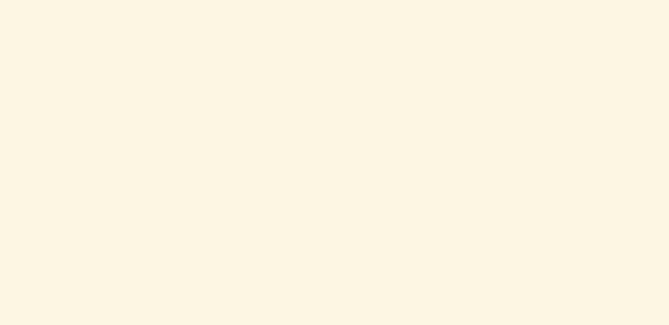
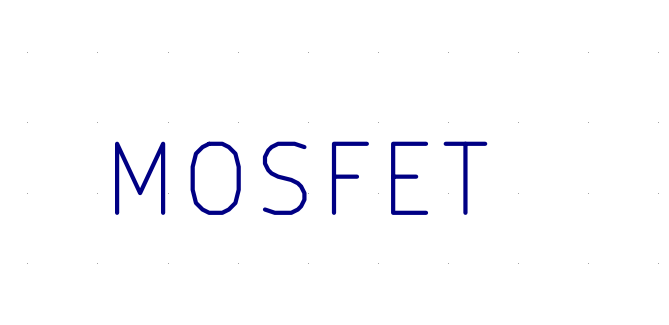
text: none -> MOSFET (301, 178)

